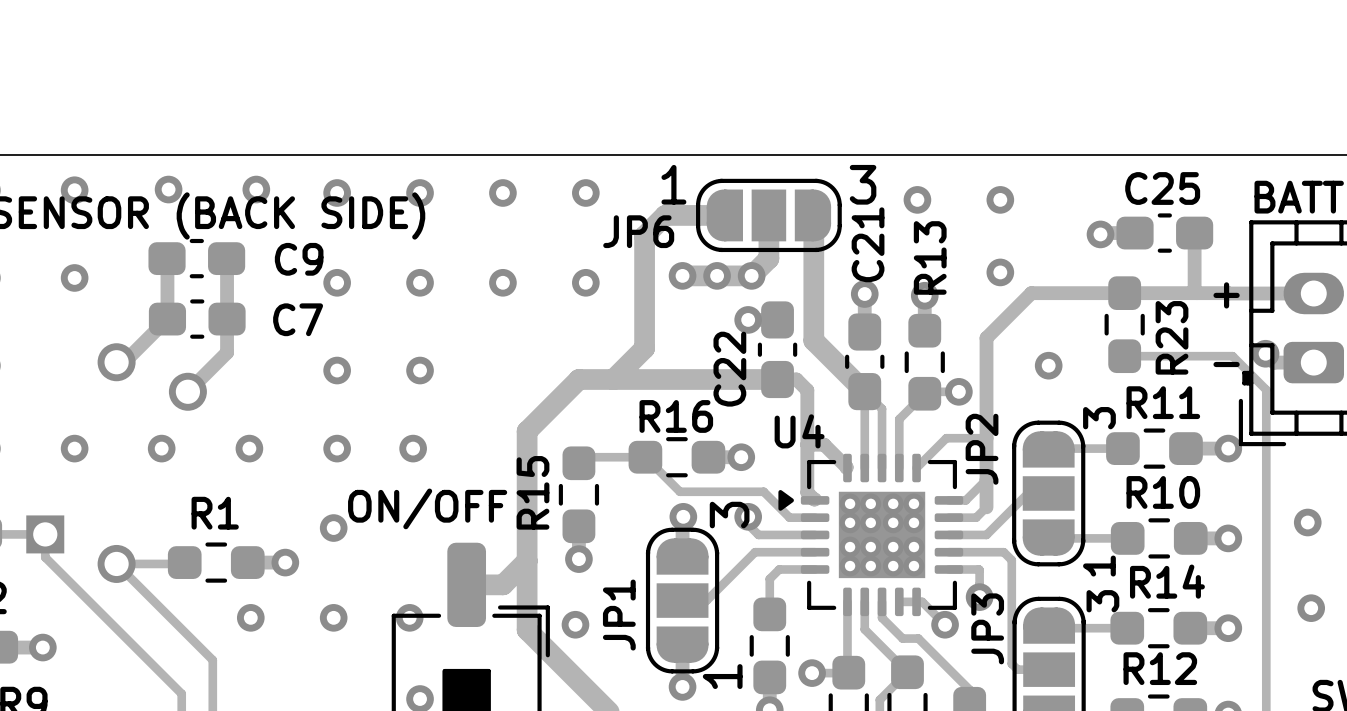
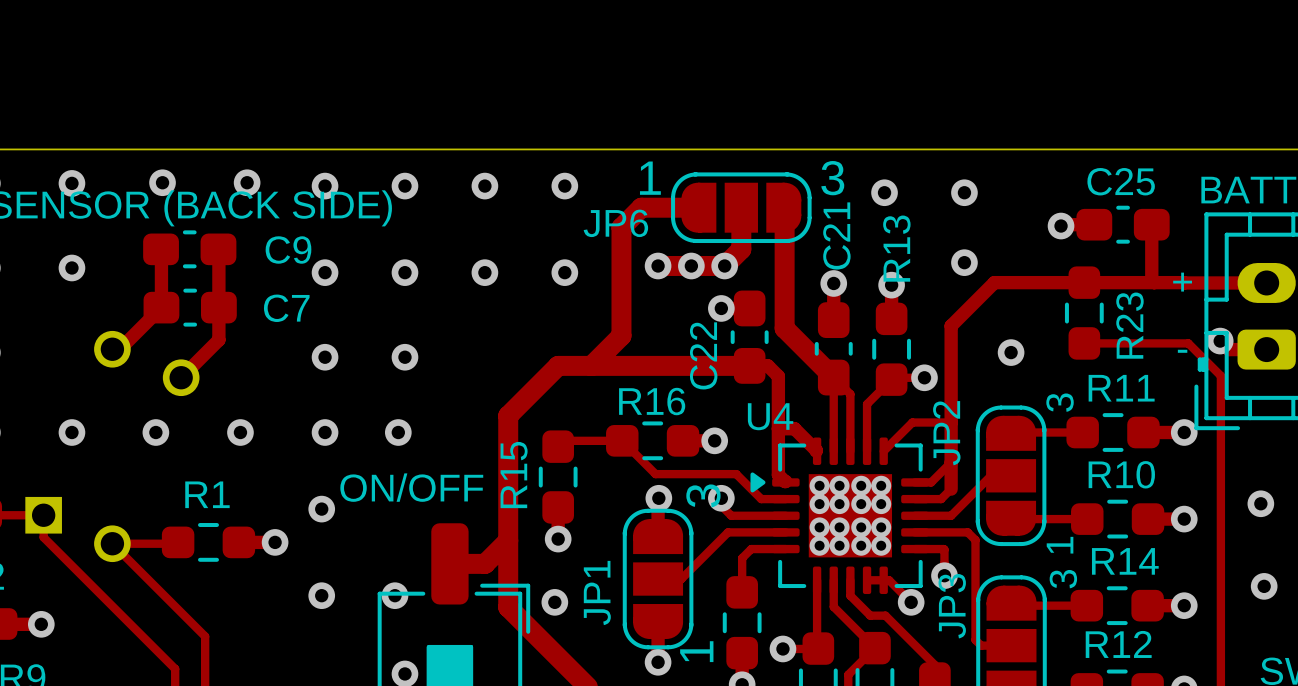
via: (250, 617) -> none

